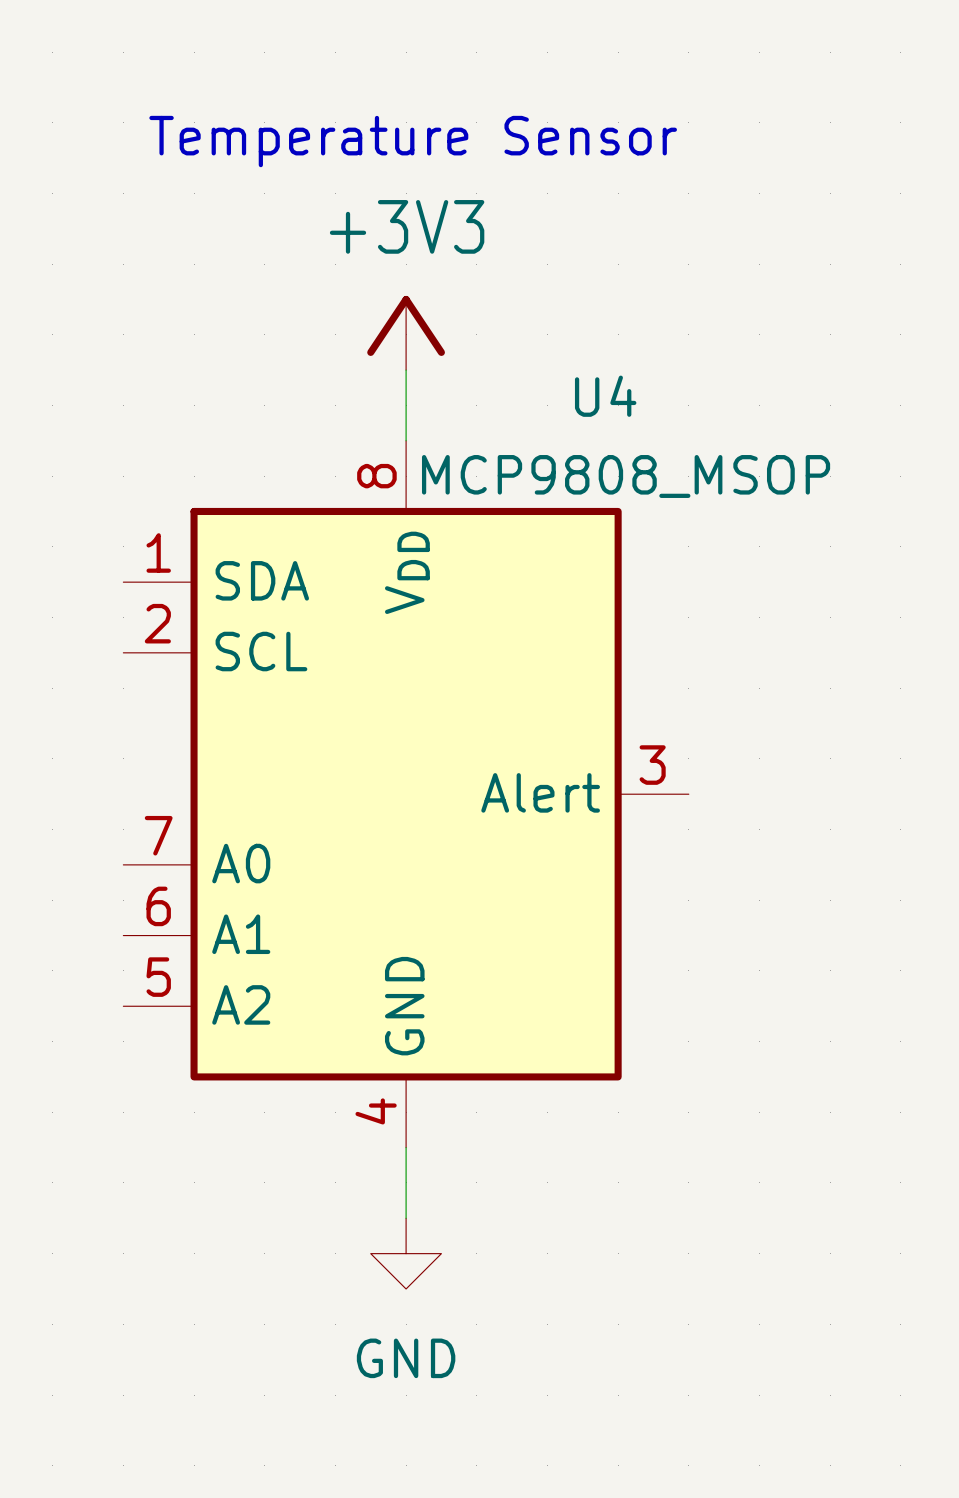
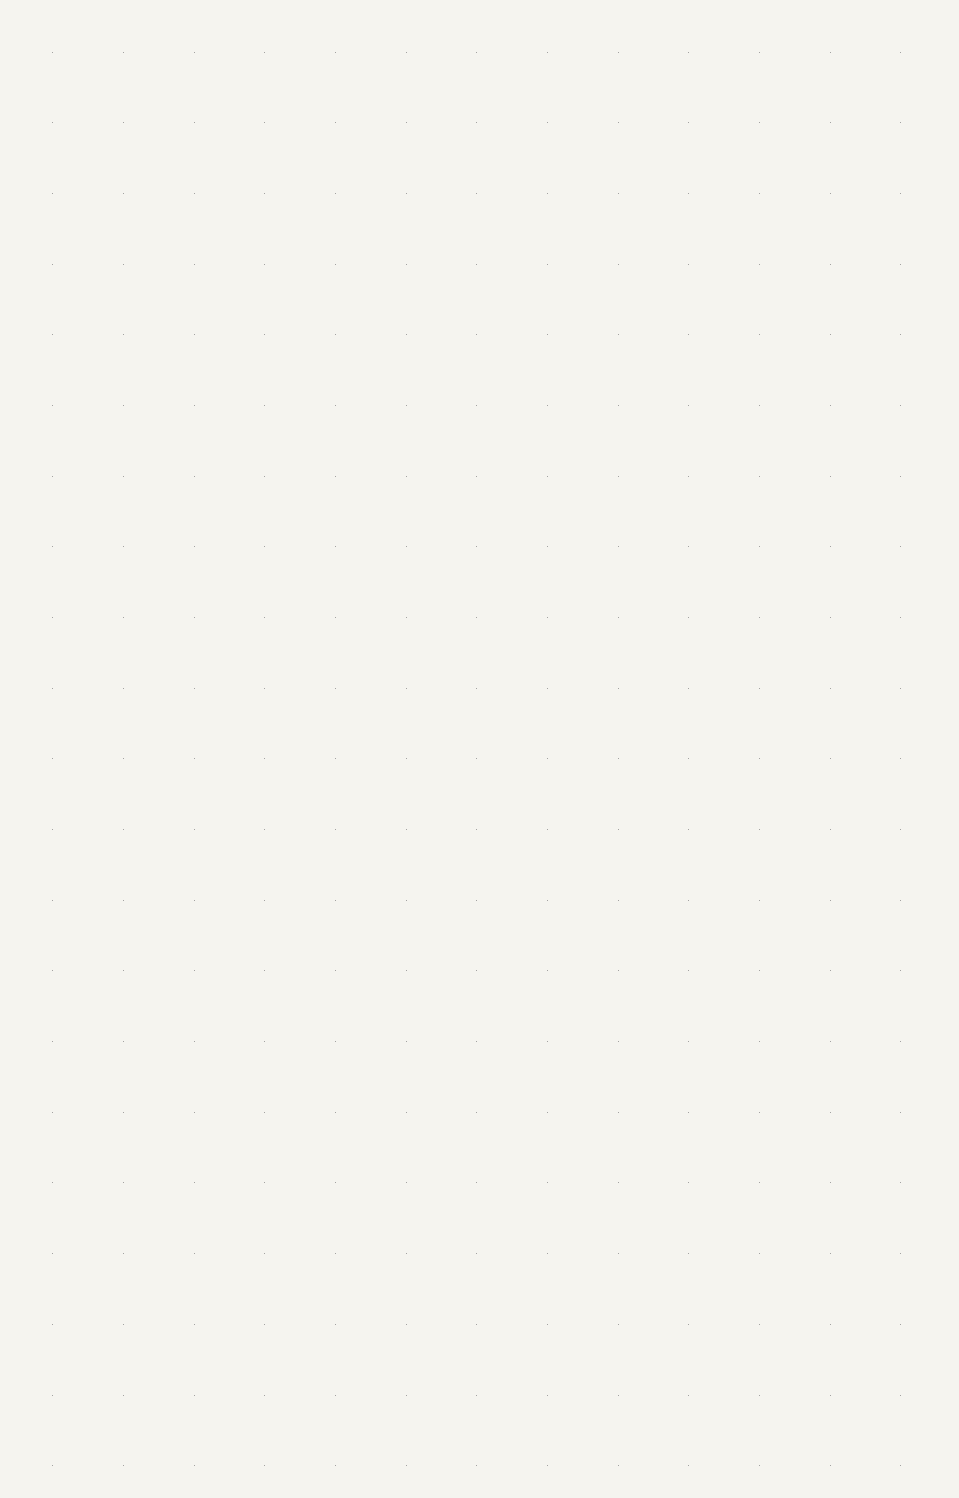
text: Temperature Sensor (413, 141) -> none
power symbol: +3V3 (406, 332) -> none
wire: (406, 370) (406, 440) -> none
U4: MCP9808_MSOP (406, 794) -> none
wire: (406, 1147) (406, 1218) -> none
power symbol: GND (406, 1253) -> none

